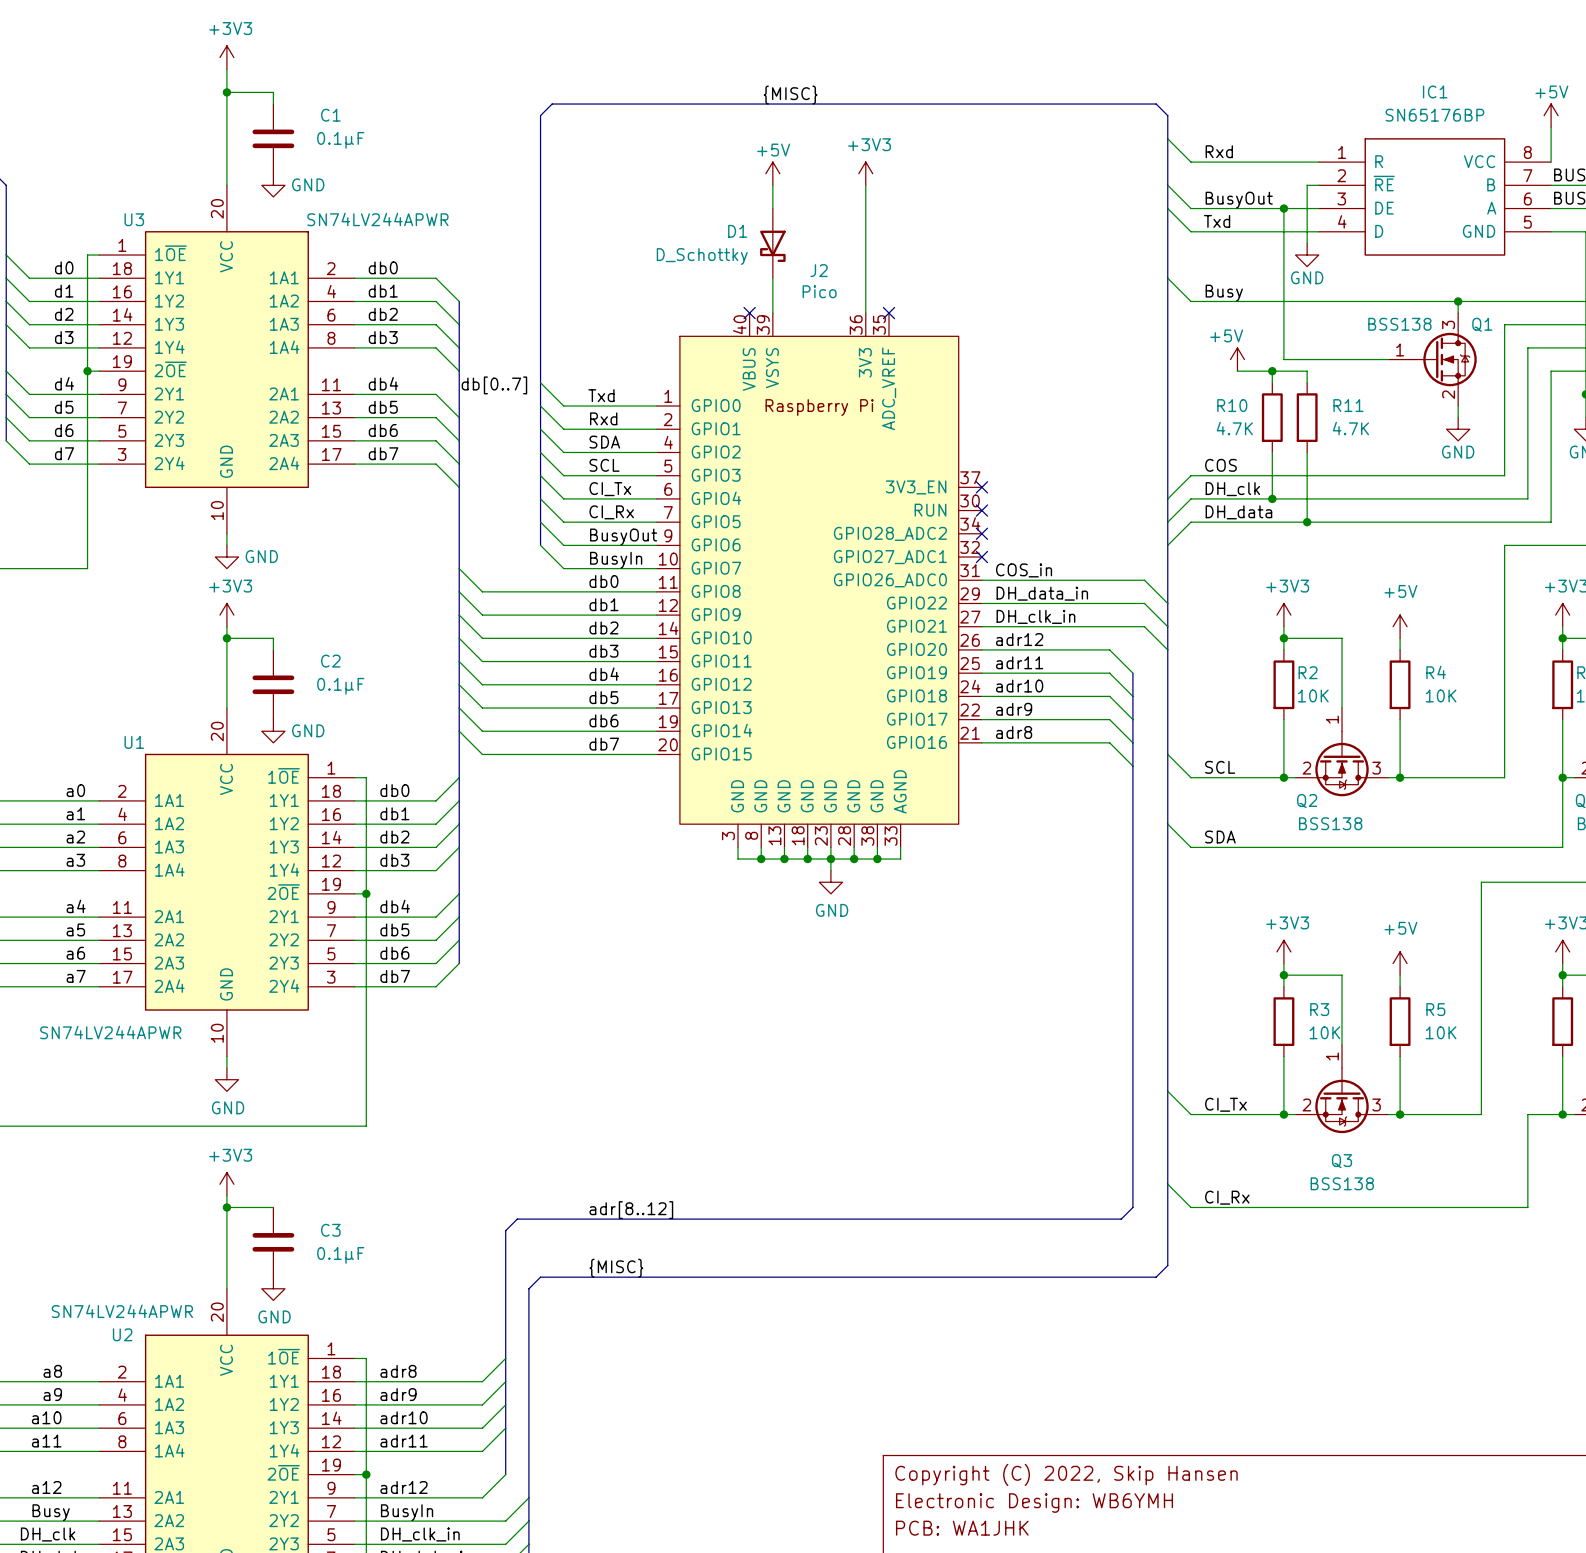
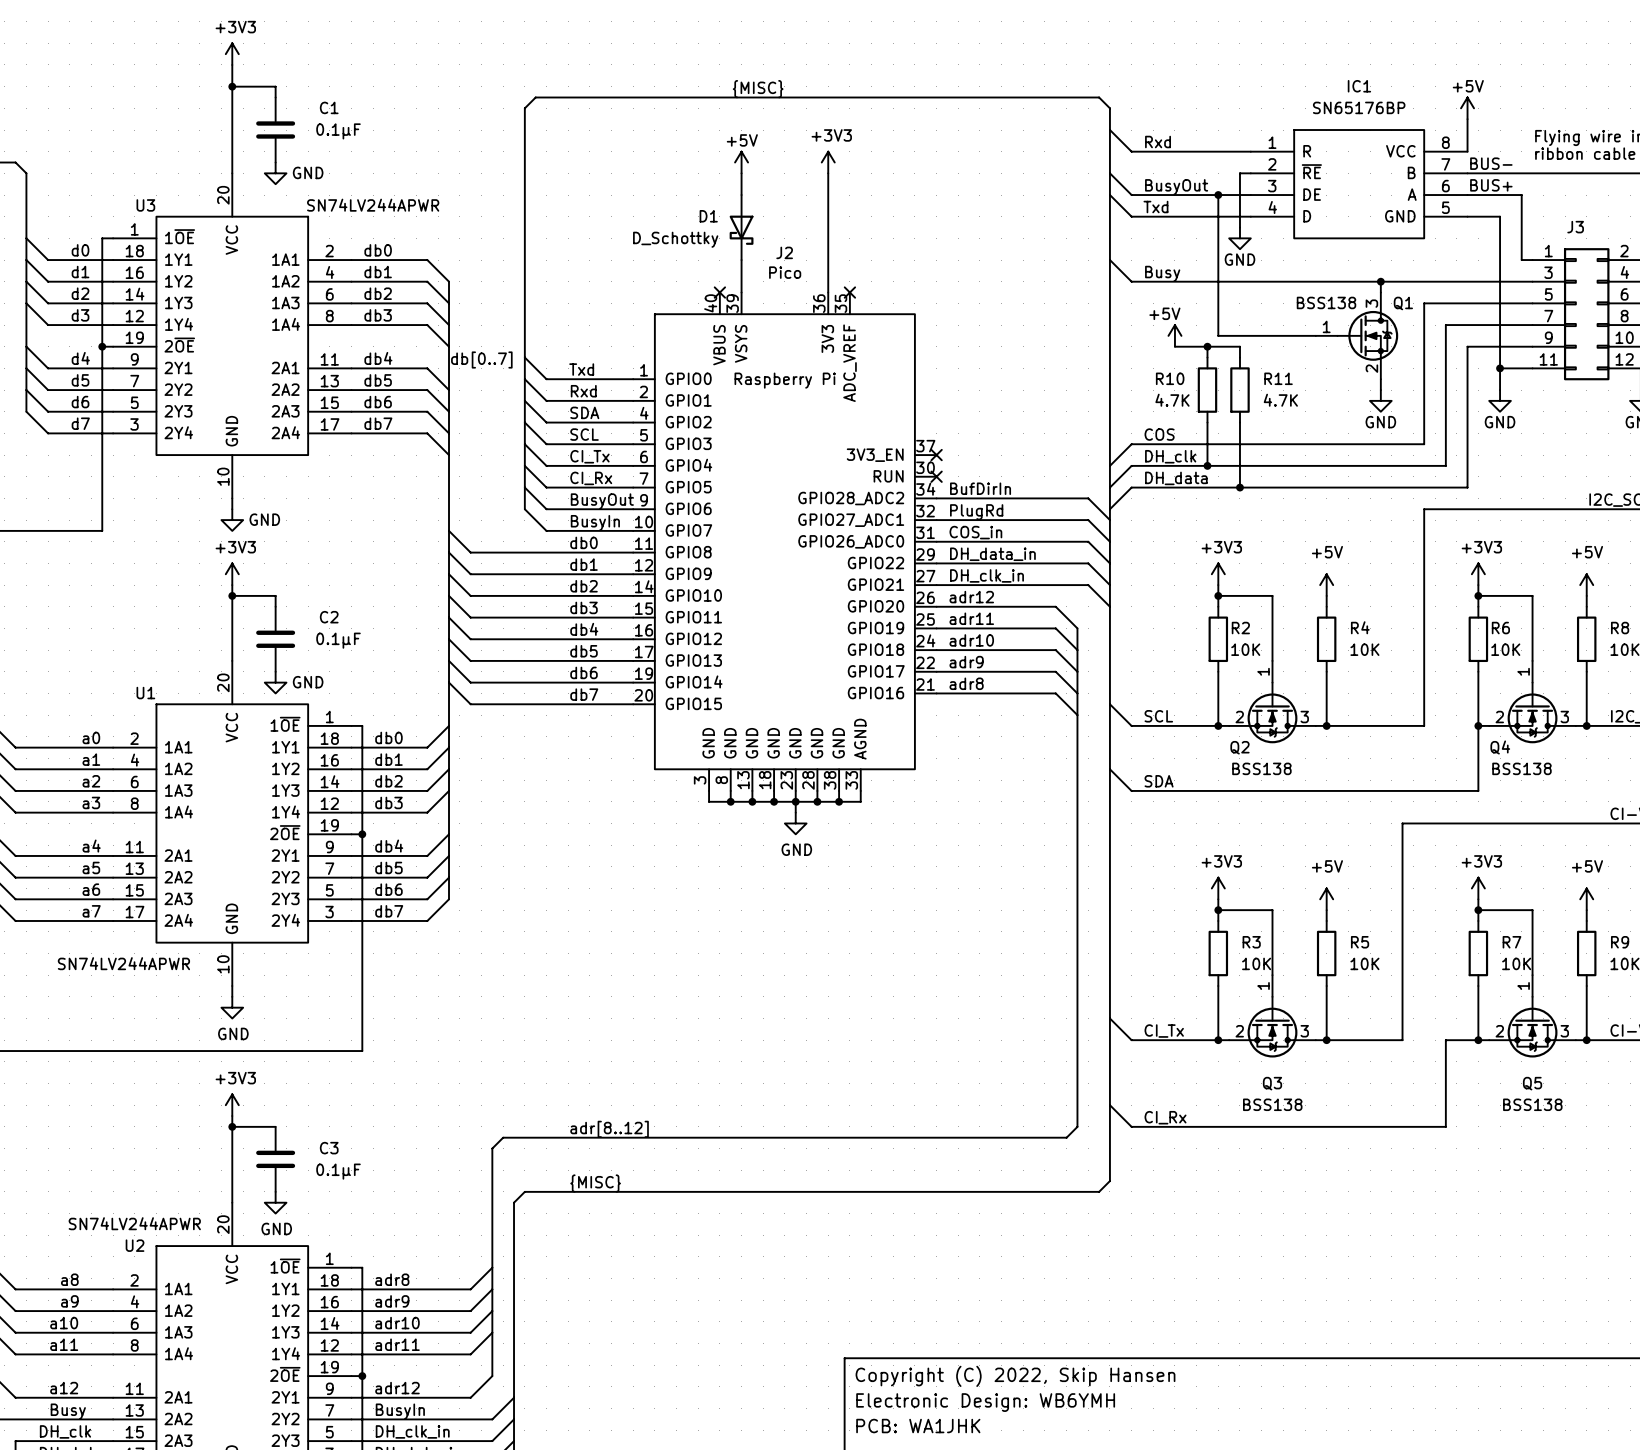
label: none -> BufDirIn (980, 488)
wire: none -> (936, 498) (1088, 498) (1109, 520)
no-connect mark: (981, 533) -> none
label: none -> PlugRd (976, 512)
wire: none -> (936, 520) (1088, 520) (1109, 541)
no-connect mark: (981, 557) -> none

